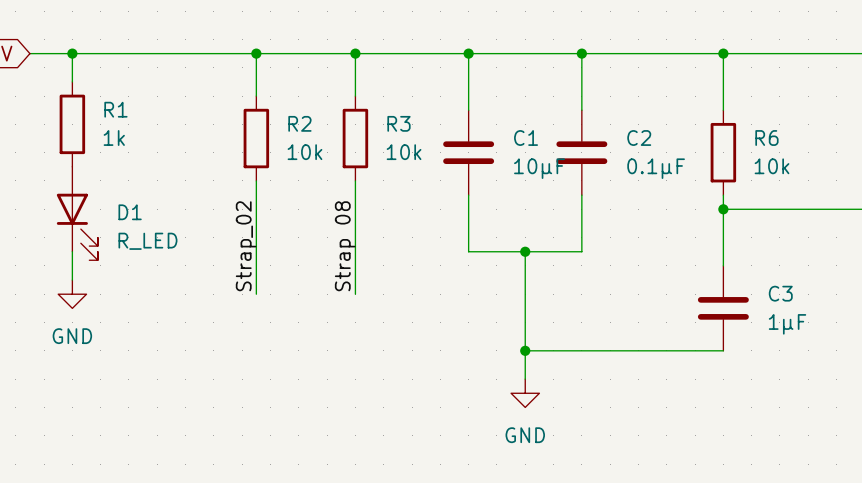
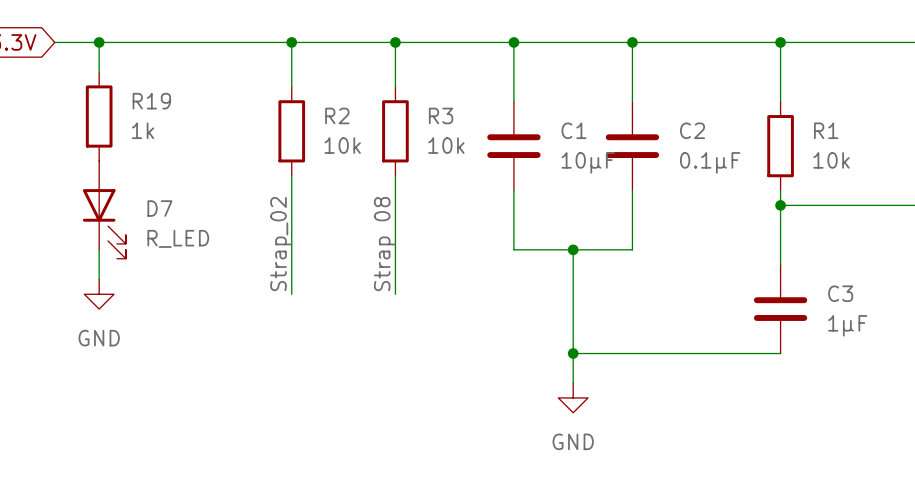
R1 name: R1 (115, 109) -> R19 (151, 101)
R6 name: R6 (766, 138) -> R1 (826, 130)
D1 name: D1 (130, 212) -> D7 (159, 208)

